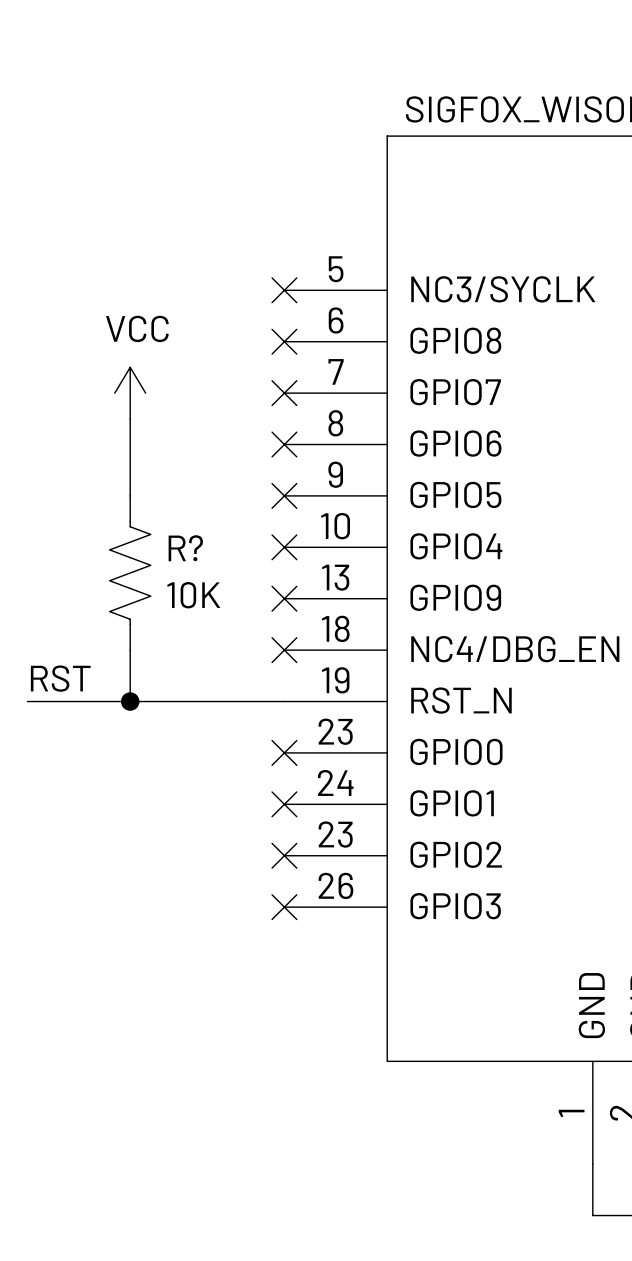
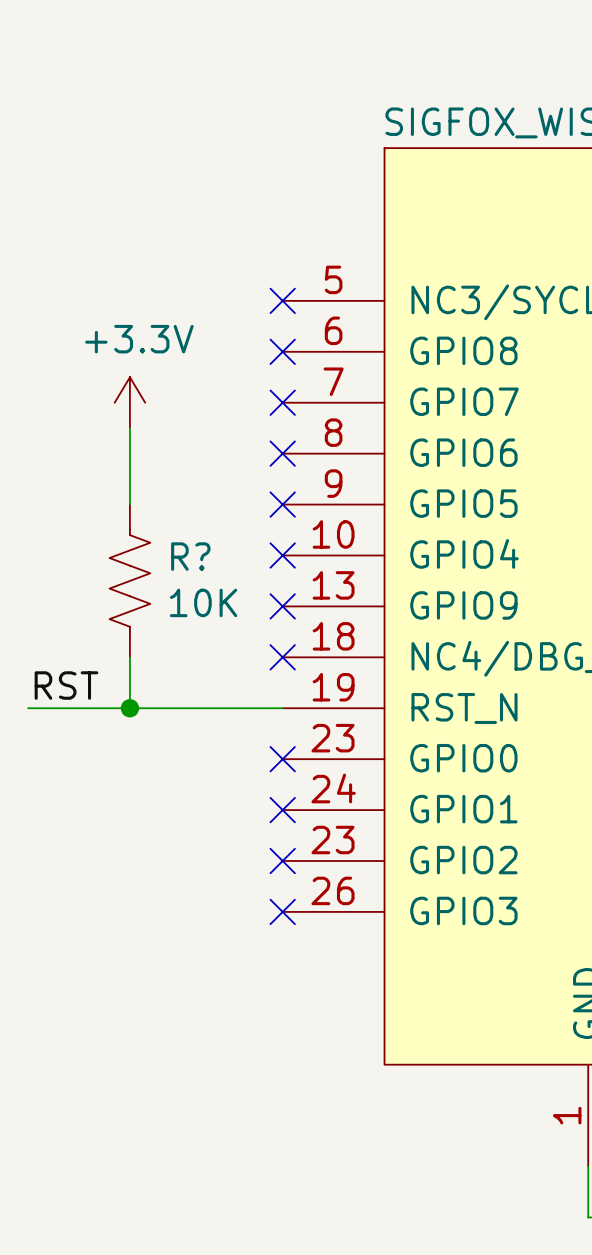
power symbol: VCC (130, 393) -> +3.3V (129, 402)

